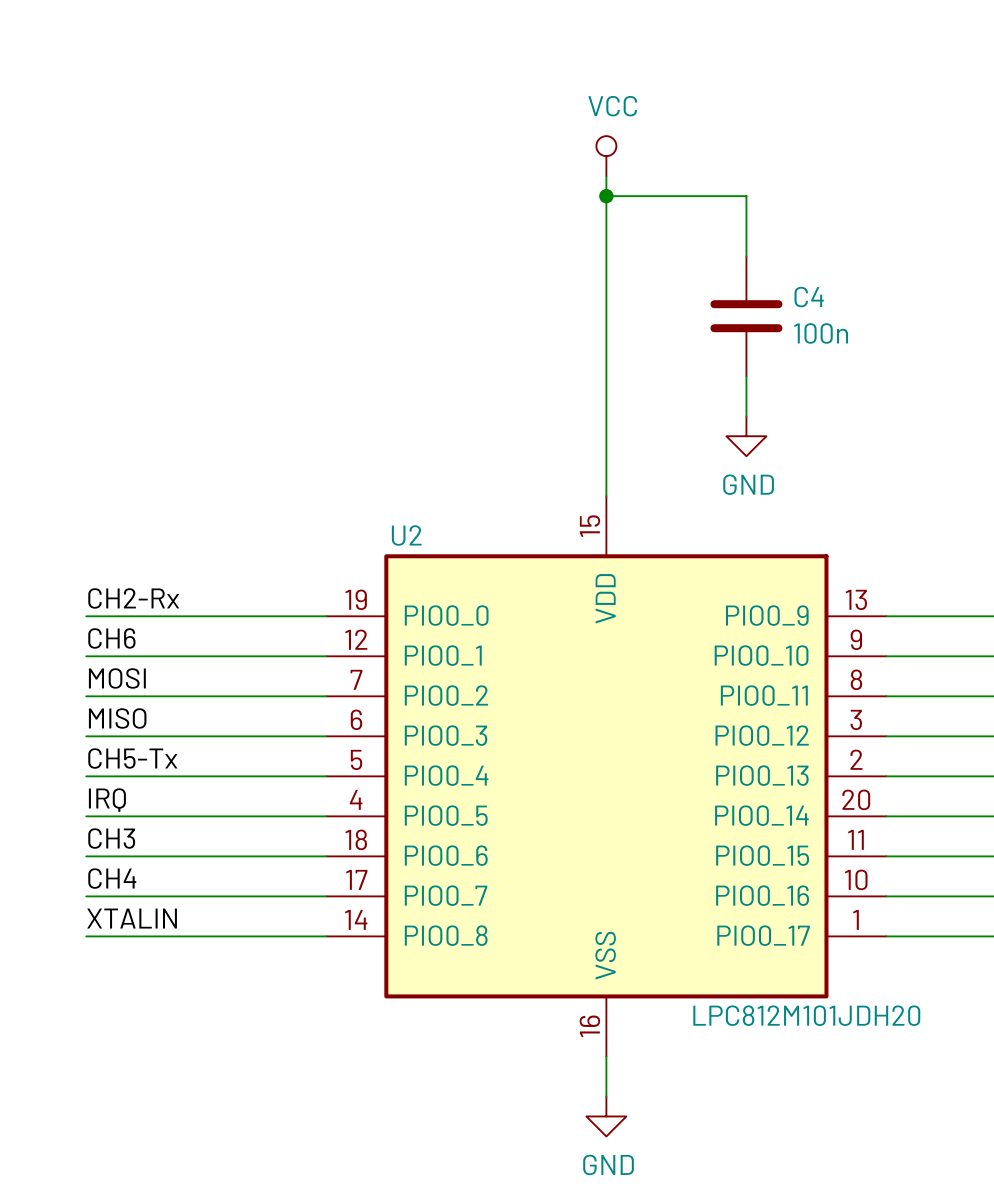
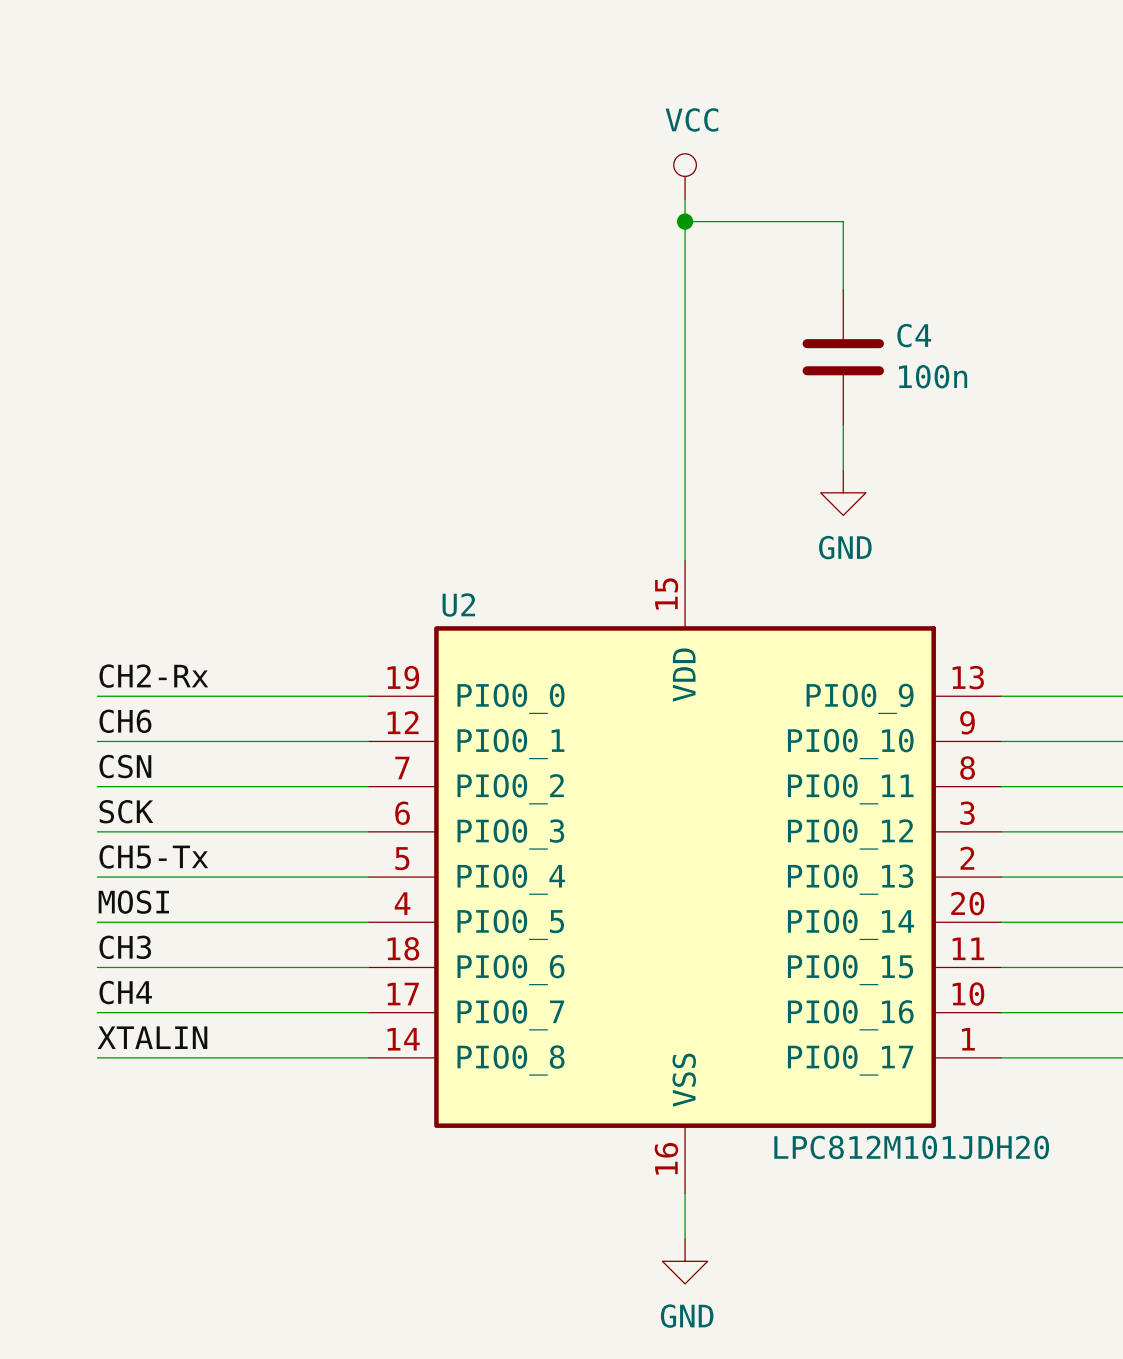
label: MOSI (117, 678) -> CSN (125, 766)
label: MISO (117, 718) -> SCK (126, 811)
label: IRQ (107, 800) -> MOSI (133, 902)

